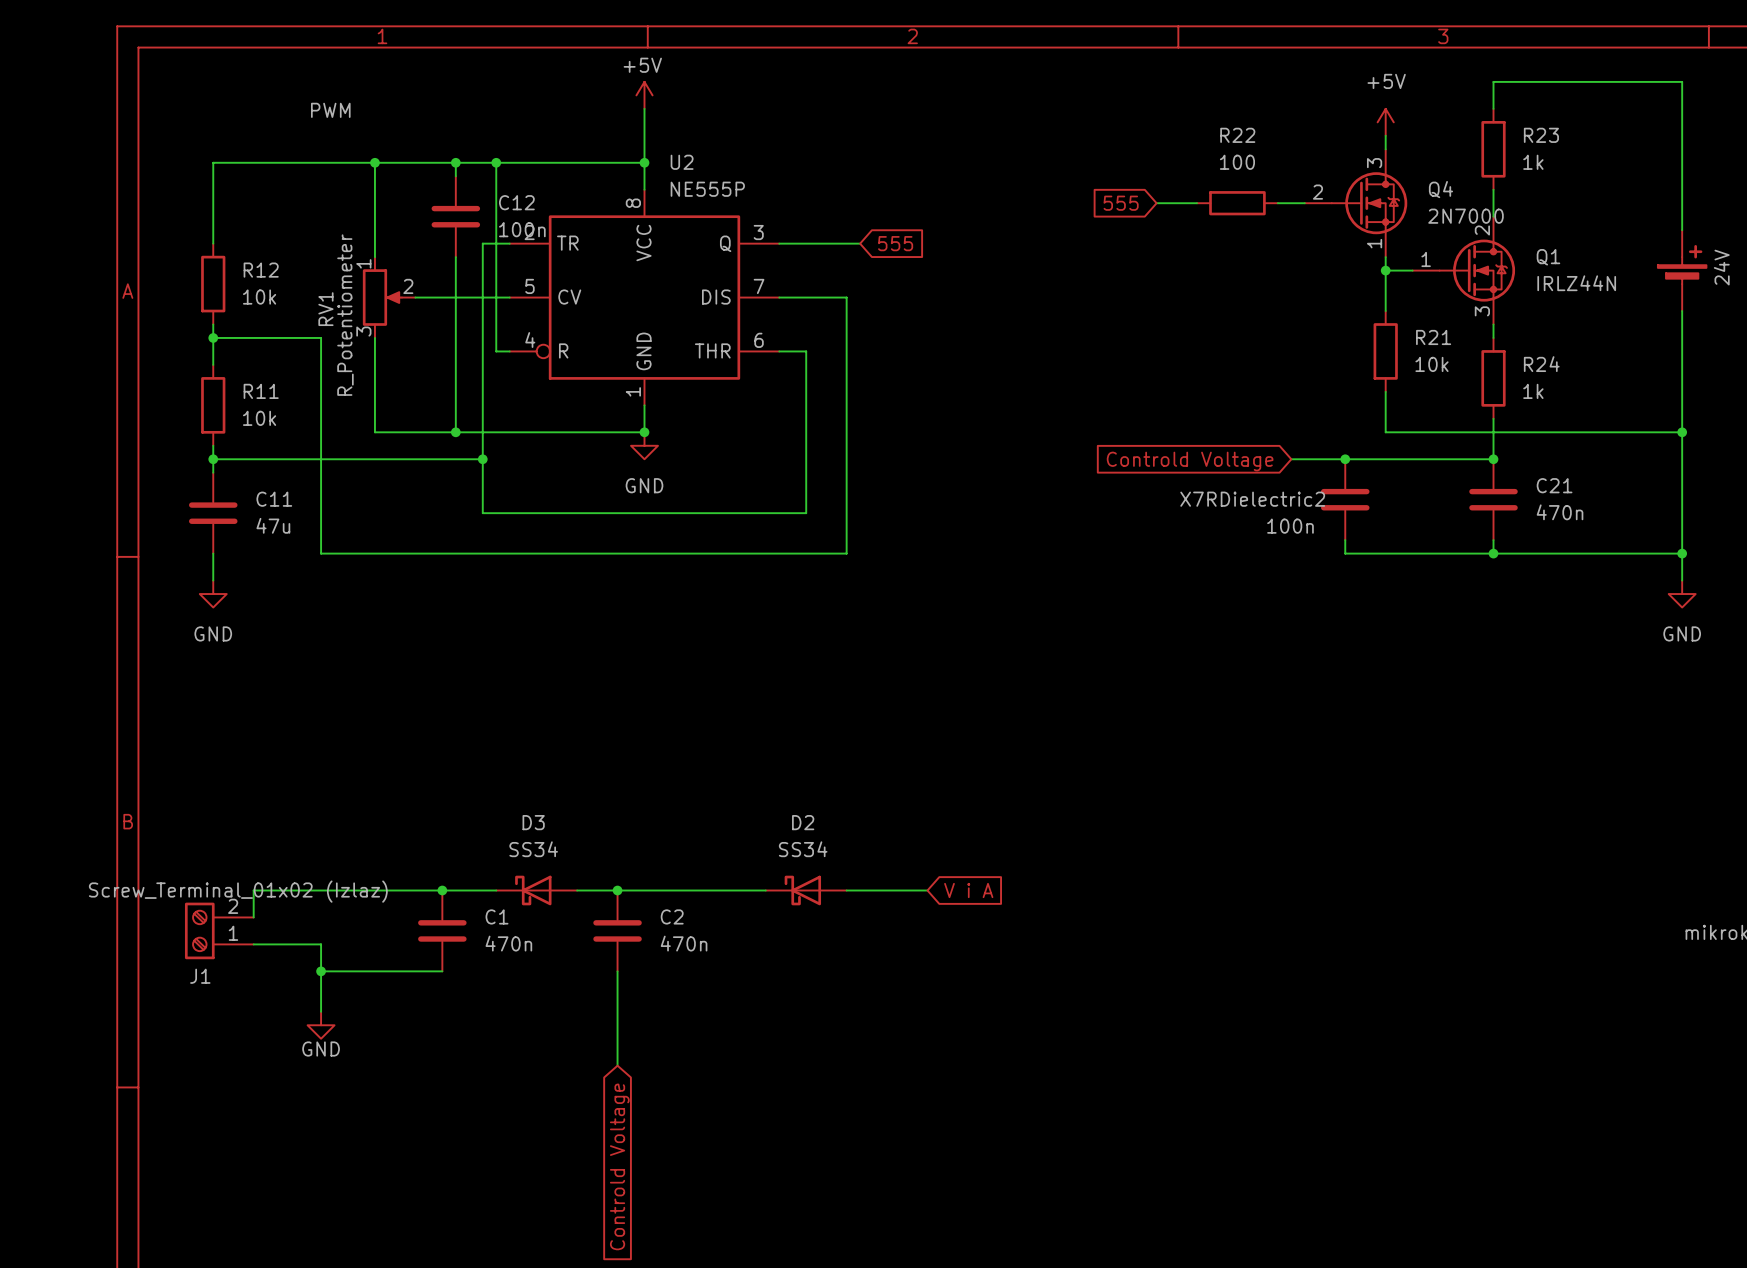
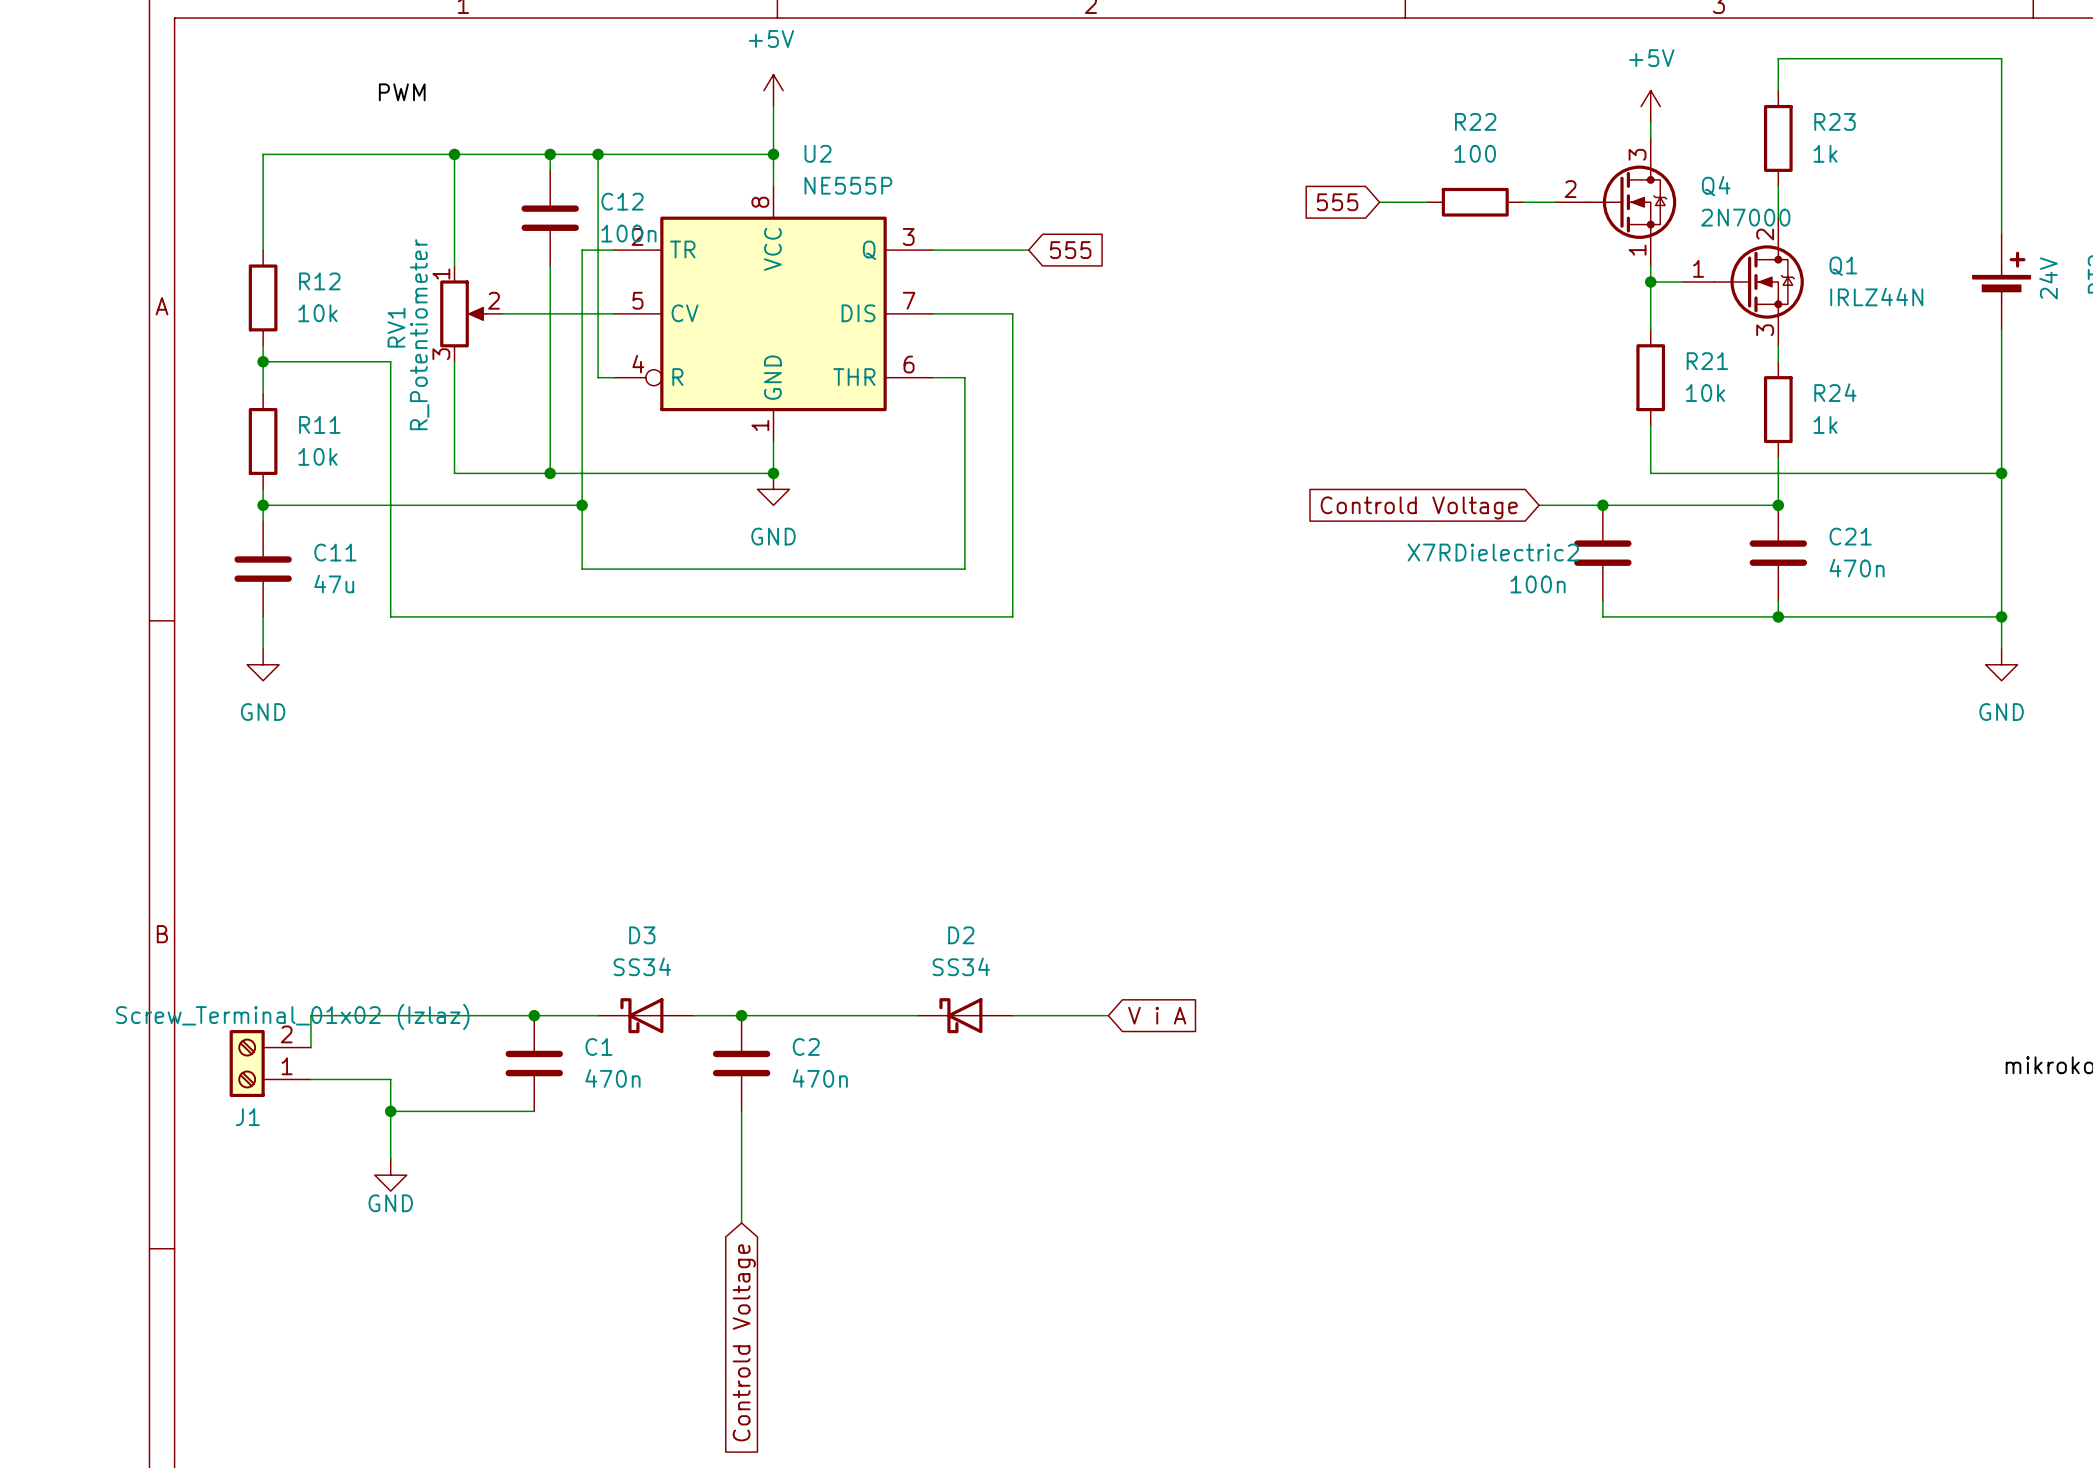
power symbol position: +5V (644, 95) -> +5V (773, 90)

